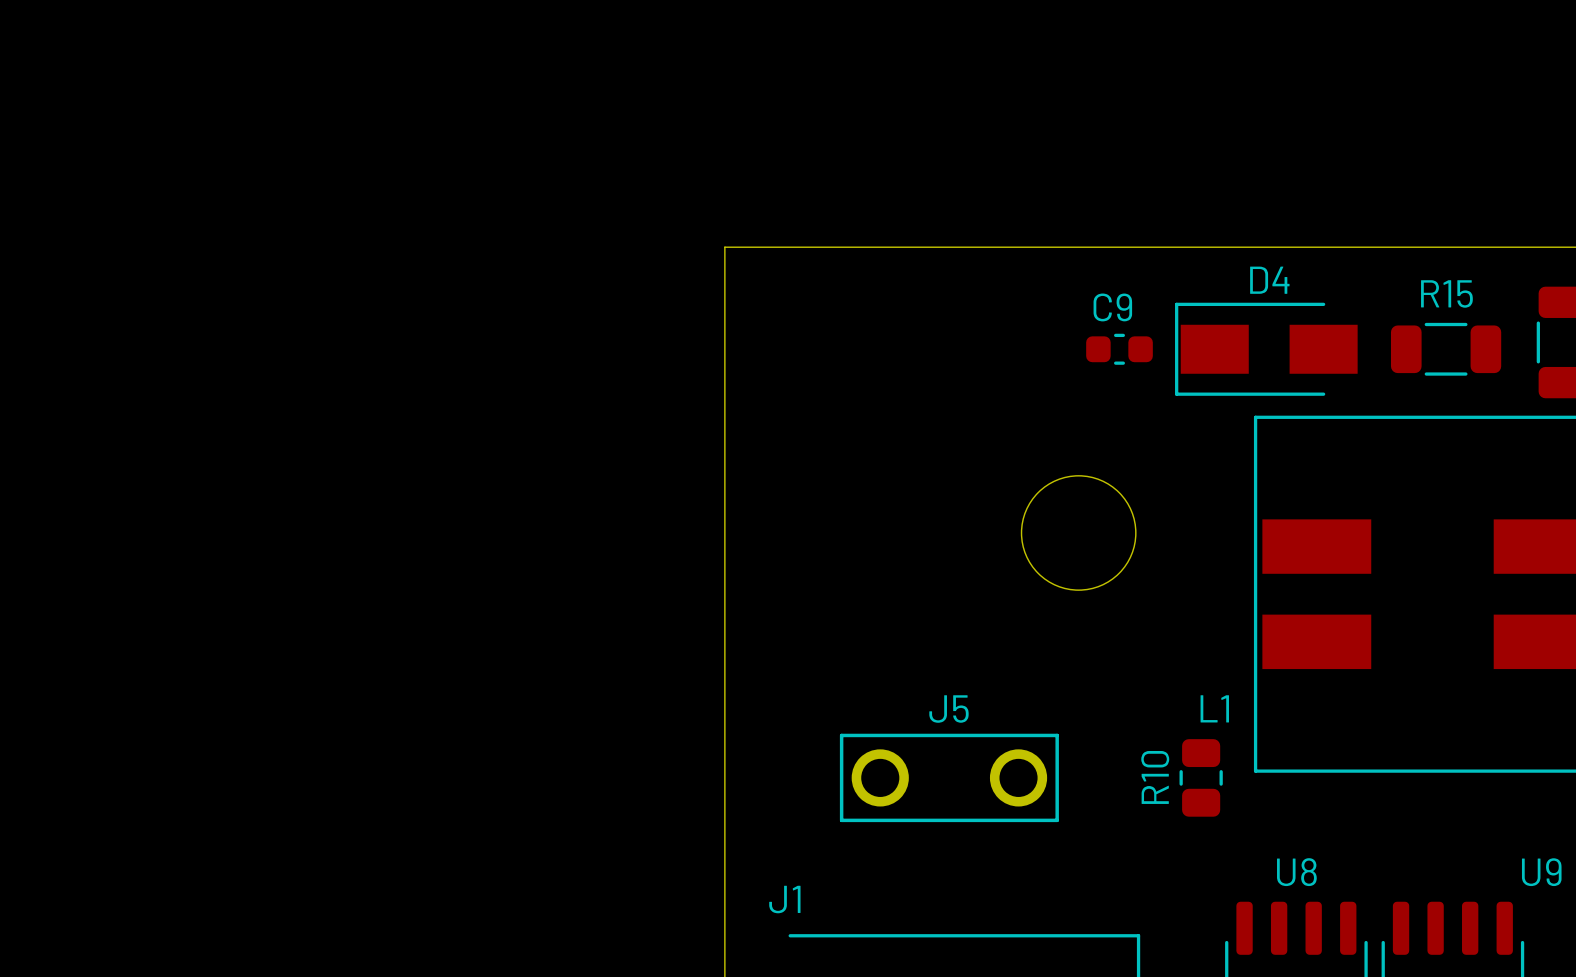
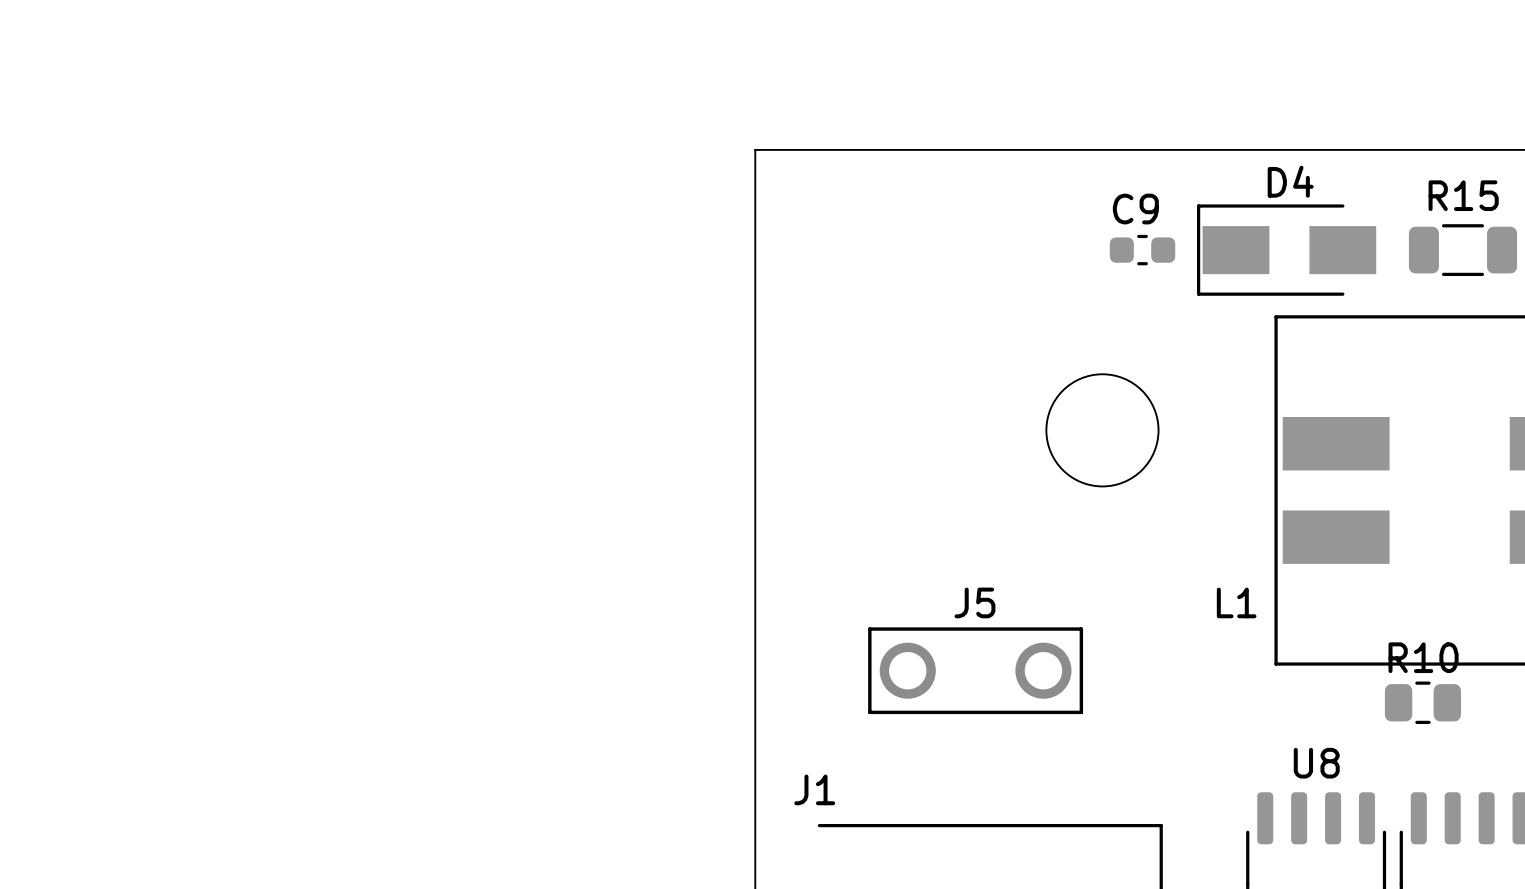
R10 rotation: 0° (1201, 777) -> 90° clockwise (1422, 702)
R10 position: (1201, 777) -> (1422, 702)

